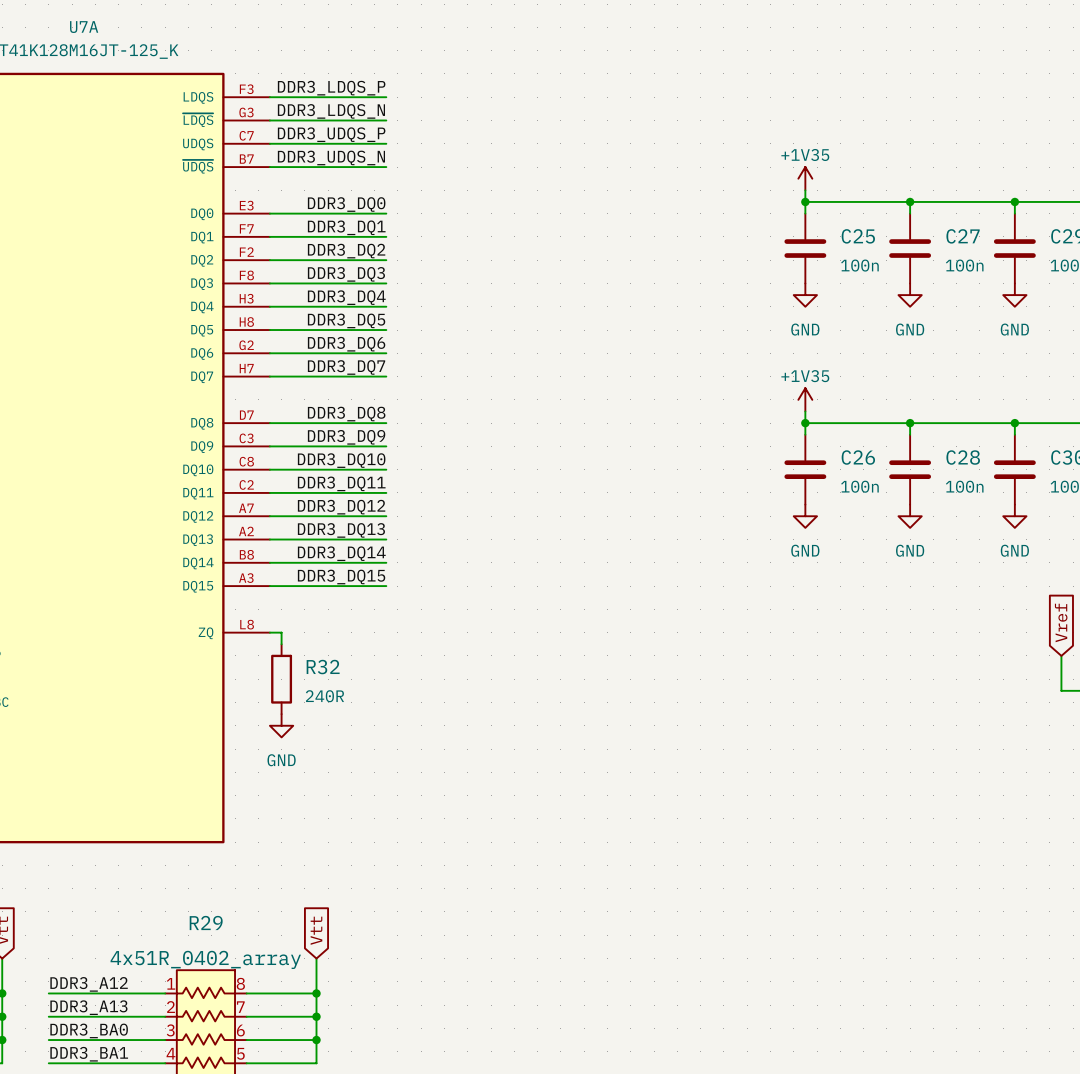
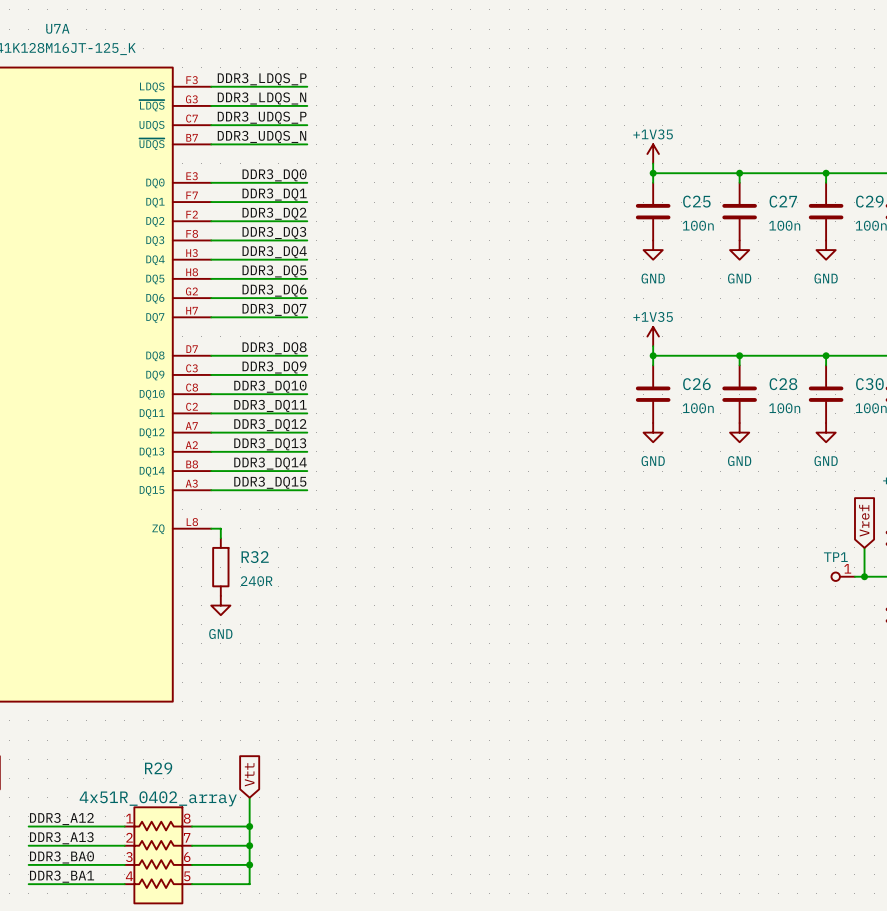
TP1: none -> (843, 576)
wire: none -> (854, 576) (864, 576)
junction: none -> (864, 576)

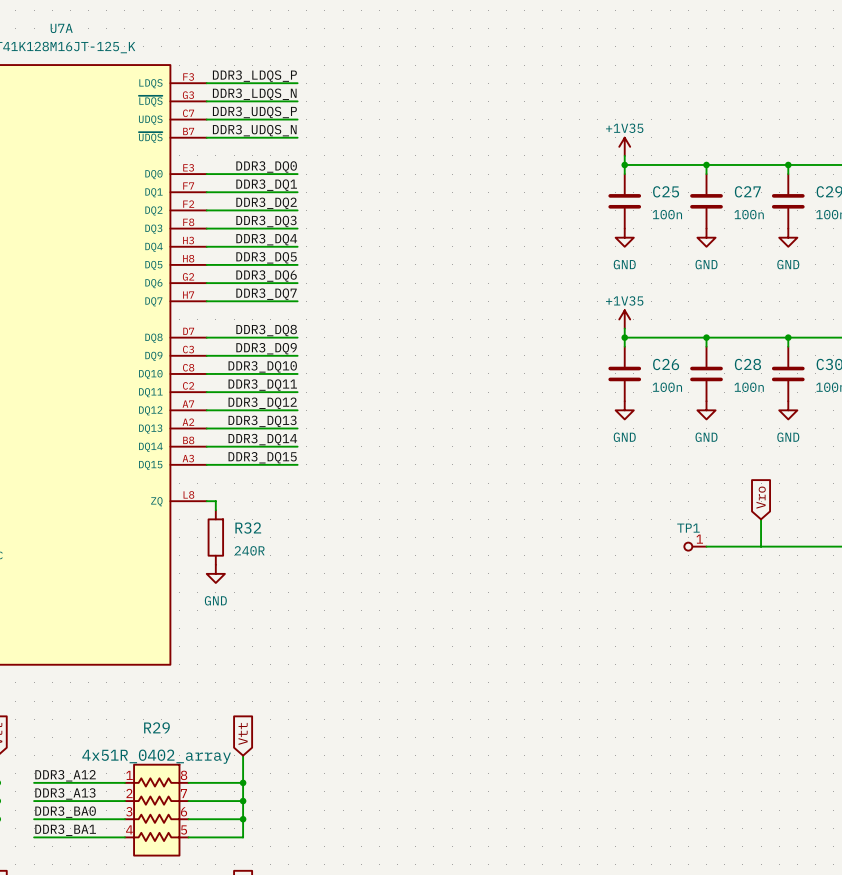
global label: Vref (864, 520) -> none
global label: none -> Vro (761, 497)
wire: (864, 547) (864, 576) -> (761, 519) (761, 546)
wire: none -> (706, 546) (815, 546)
TP1 position: (843, 576) -> (695, 546)
junction: (864, 576) -> none

